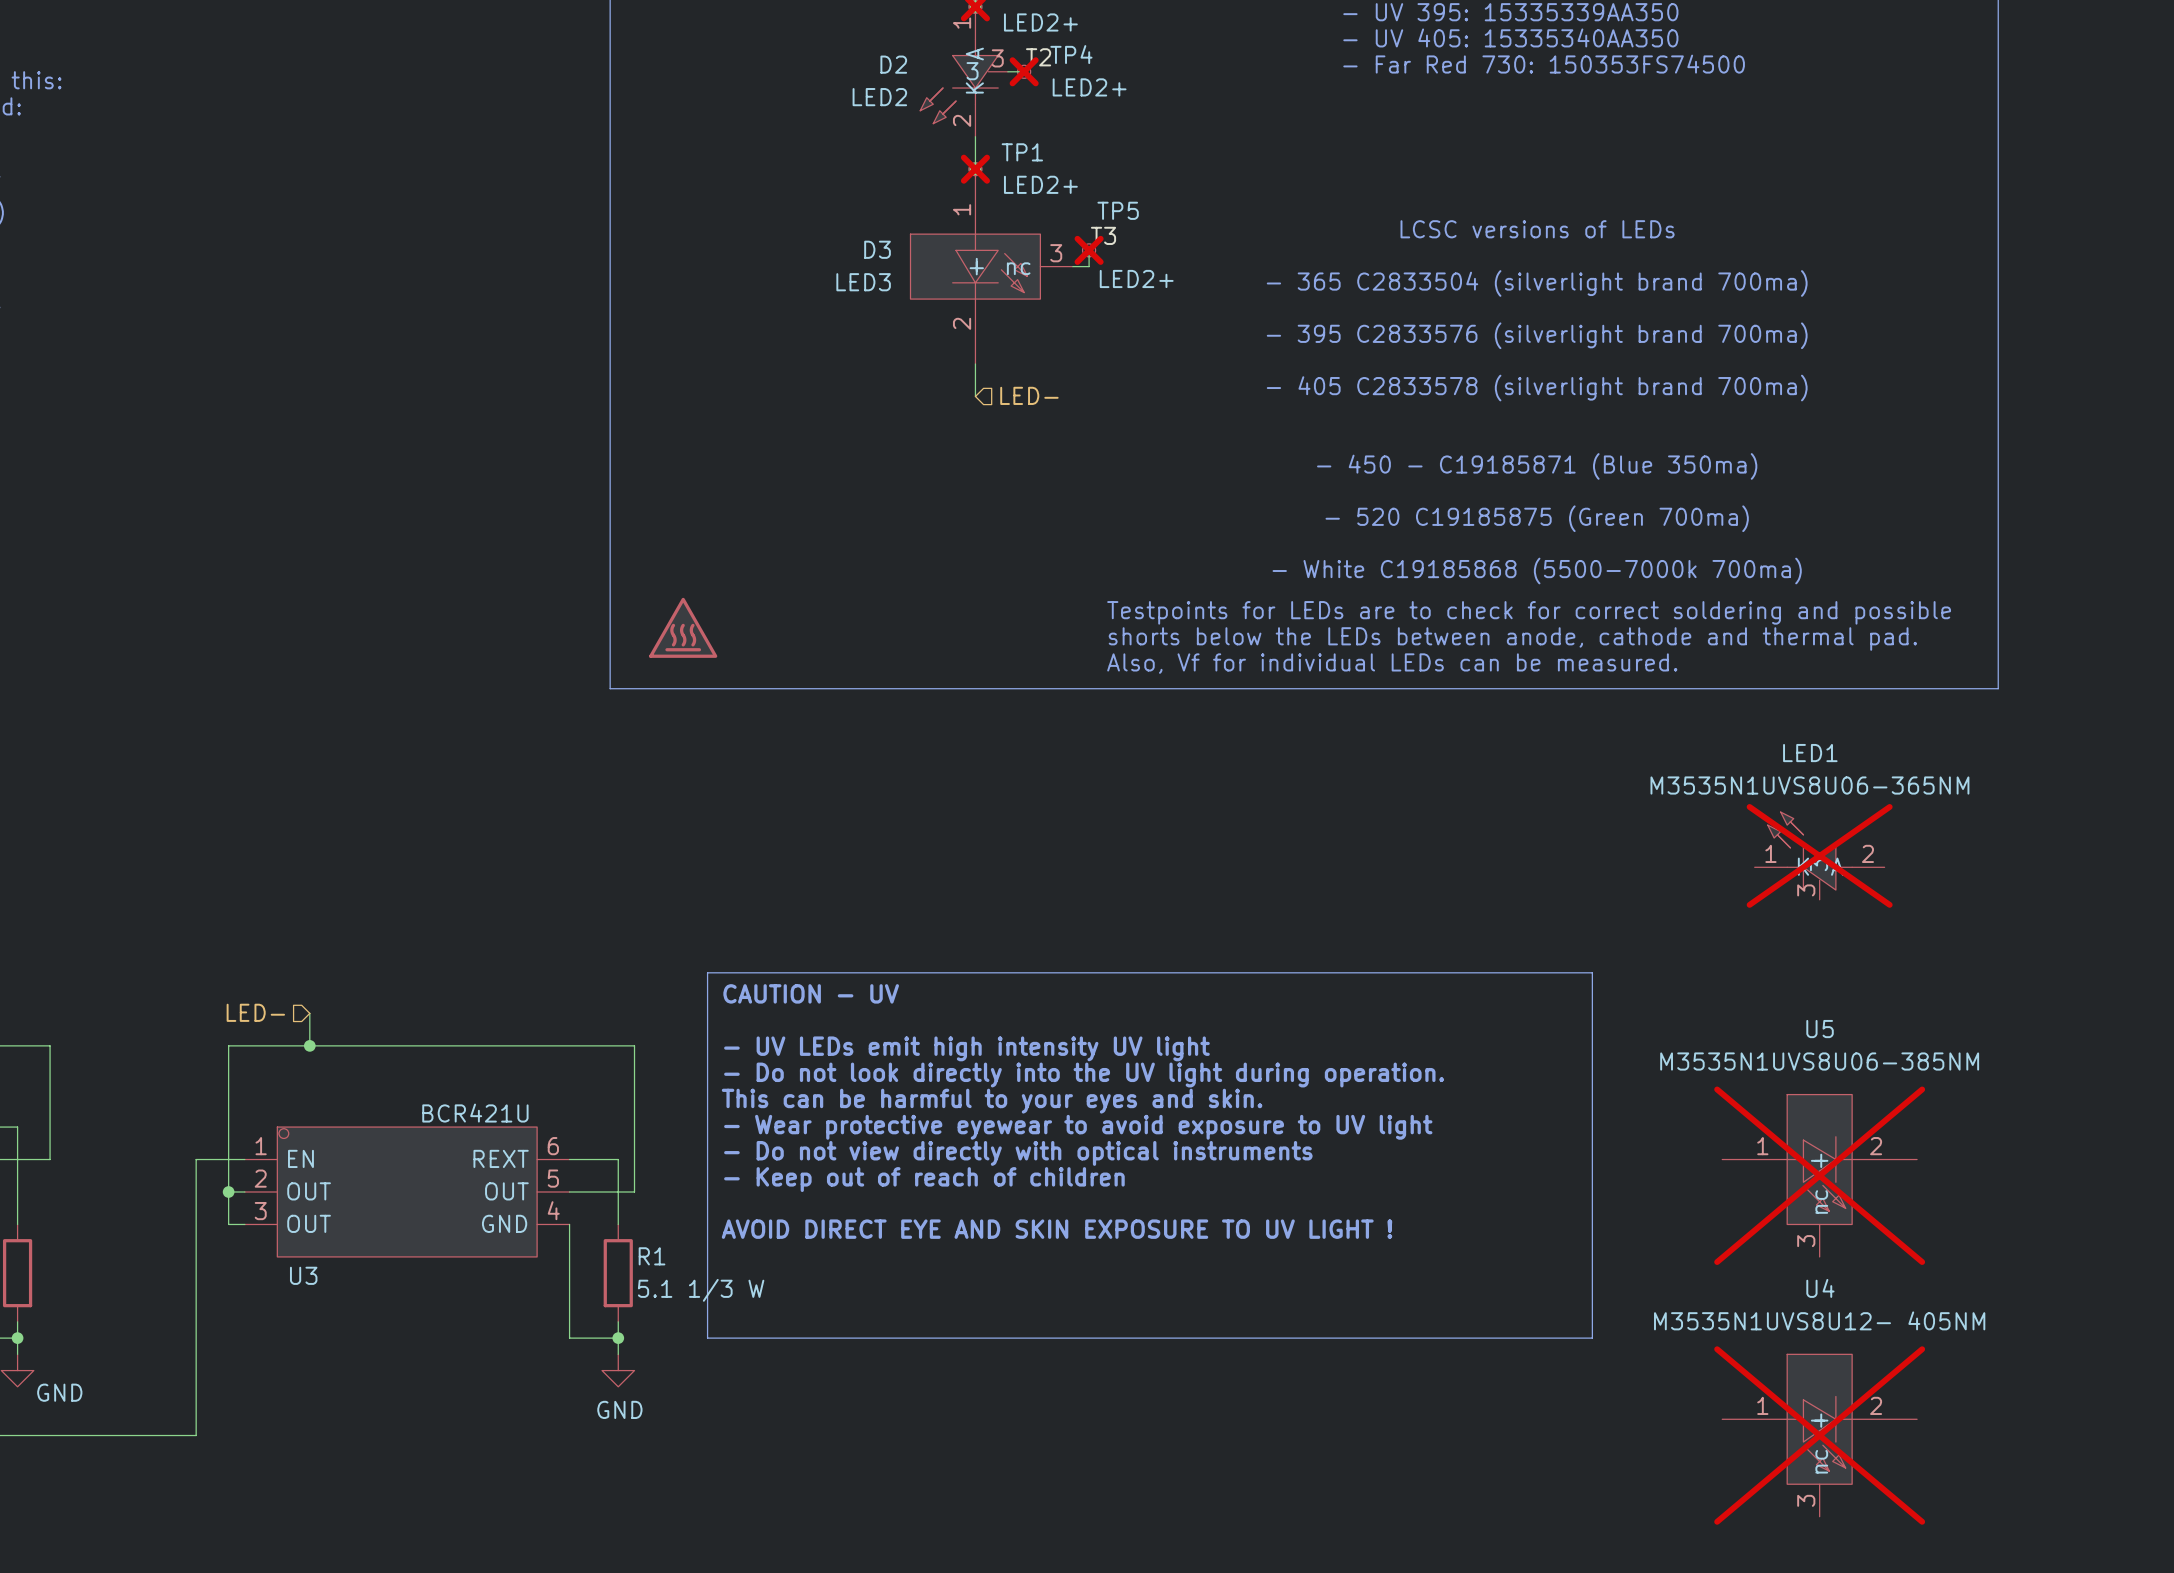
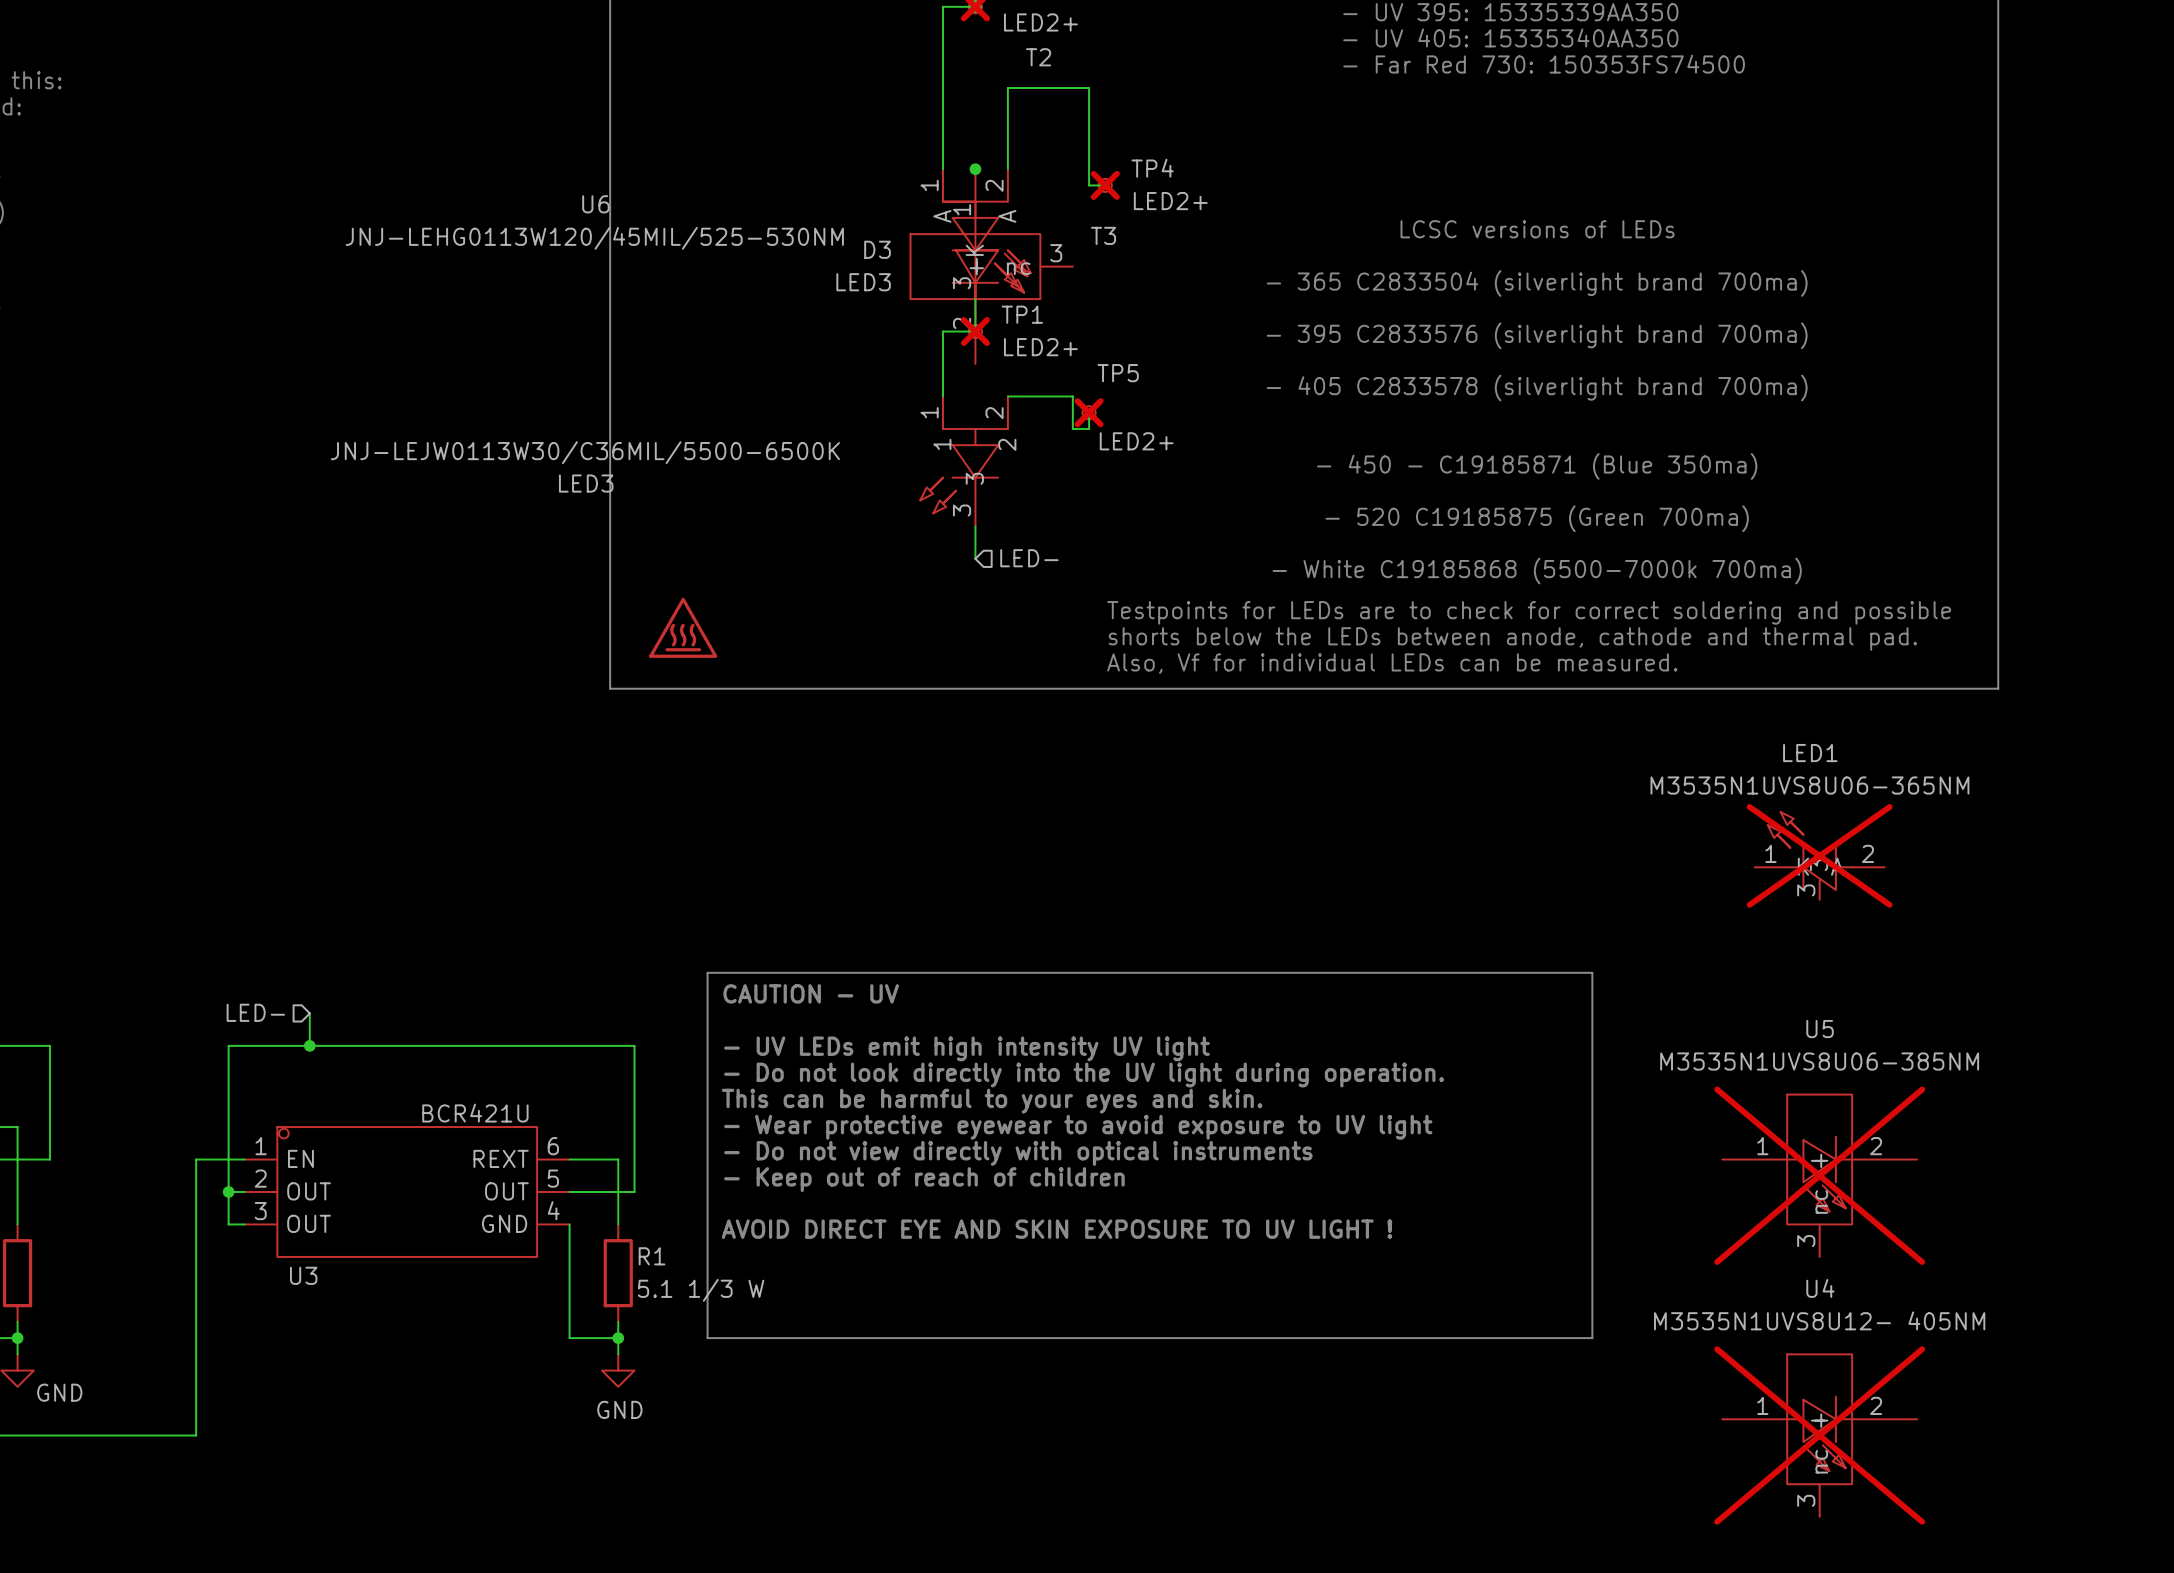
wire: none -> (975, 6) (942, 6) (942, 169)
D2: LED2 (964, 71) -> none
wire: (1007, 71) (1024, 71) -> none
TP4 position: (1024, 71) -> (1105, 185)
wire: (975, 136) (975, 169) -> none
TP1 position: (975, 169) -> (975, 331)
wire: none -> (1007, 169) (1007, 88) (1089, 88) (1089, 185) (1105, 185)
U6: none -> JNJ-LEHG0113W120/45MIL/525-530NM (986, 234)
wire: (1089, 250) (1089, 266) (1072, 266) -> none
TP5 position: (1089, 250) -> (1089, 412)
wire: none -> (975, 299) (975, 331) (942, 331) (942, 396)
wire: (975, 364) (975, 396) -> (975, 526) (975, 558)
hierarchical label position: LED- (1029, 395) -> LED- (1029, 558)
wire: none -> (1007, 396) (1072, 396) (1072, 428) (1089, 428) (1089, 412)
LED3: none -> JNJ-LEJW0113W30/C36MIL/5500-6500K (964, 461)

